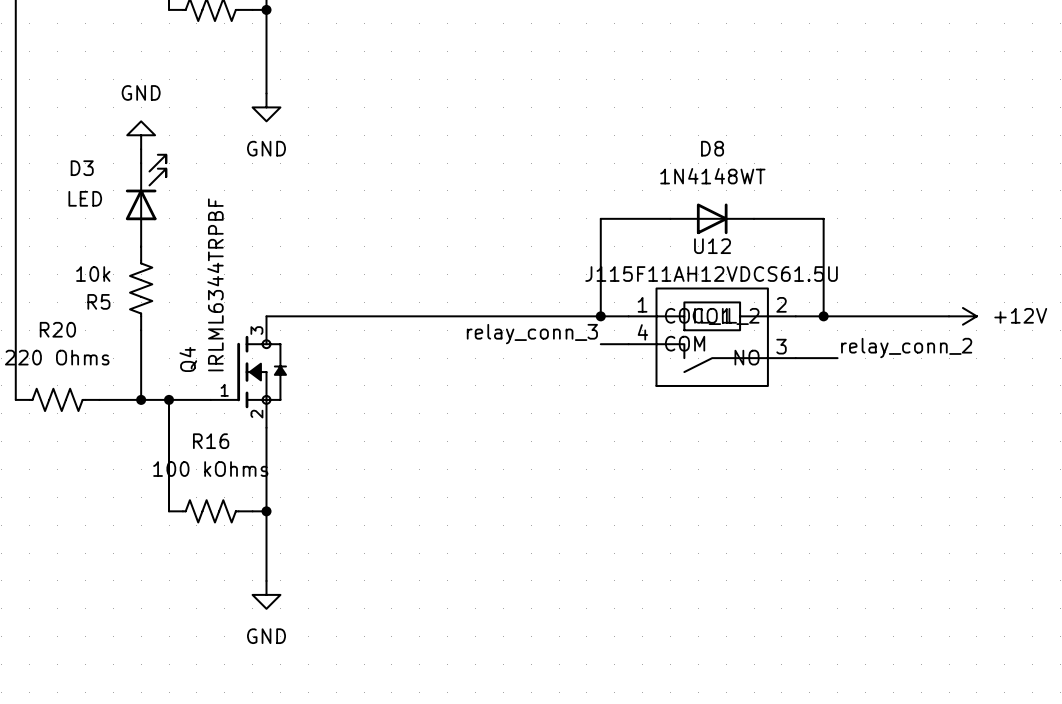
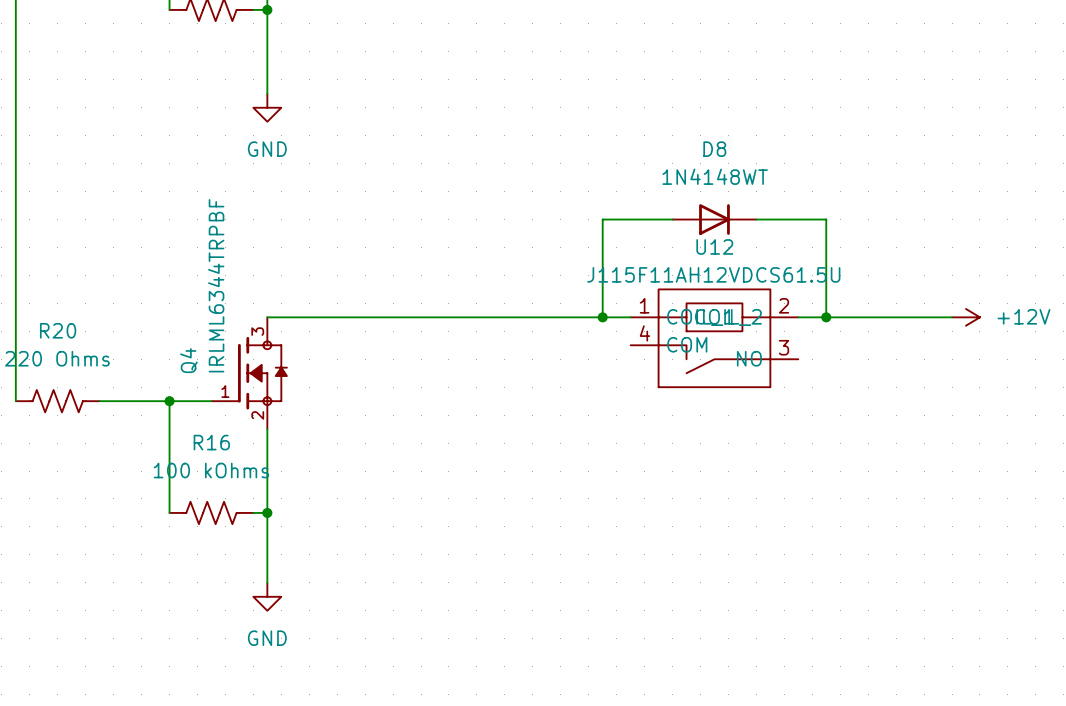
power symbol: GND (141, 135) -> none
wire: (141, 149) (141, 163) -> none
D3: LED (146, 200) -> none
R5: 10k (141, 288) -> none
wire: (141, 330) (141, 399) -> none
label: relay_conn_3 (532, 334) -> none
wire: (600, 344) (628, 344) -> none
label: relay_conn_2 (906, 348) -> none
wire: (795, 358) (837, 358) -> none
junction: (141, 399) -> none

